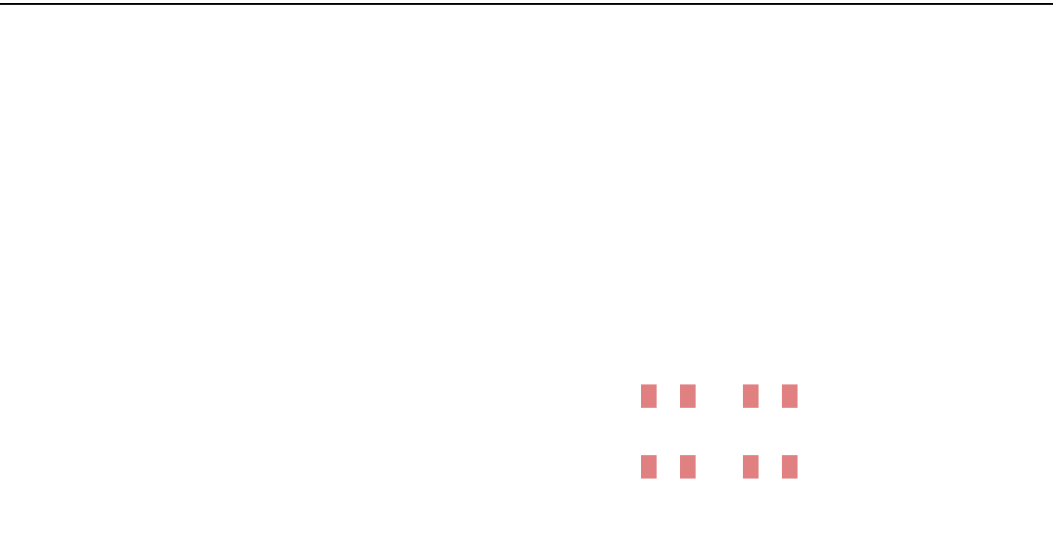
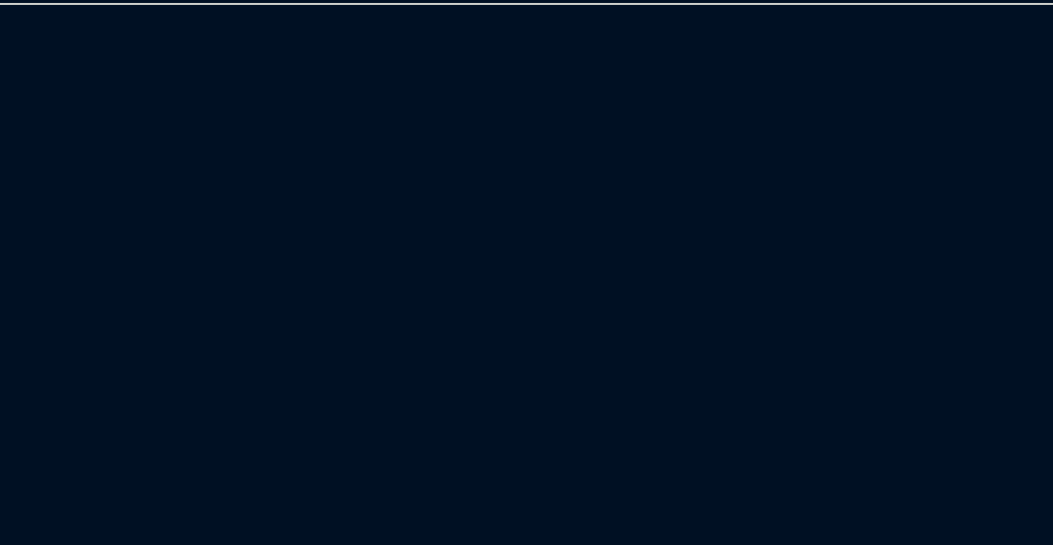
part: (668, 396) -> none
part: (770, 396) -> none
part: (668, 466) -> none
part: (770, 466) -> none

